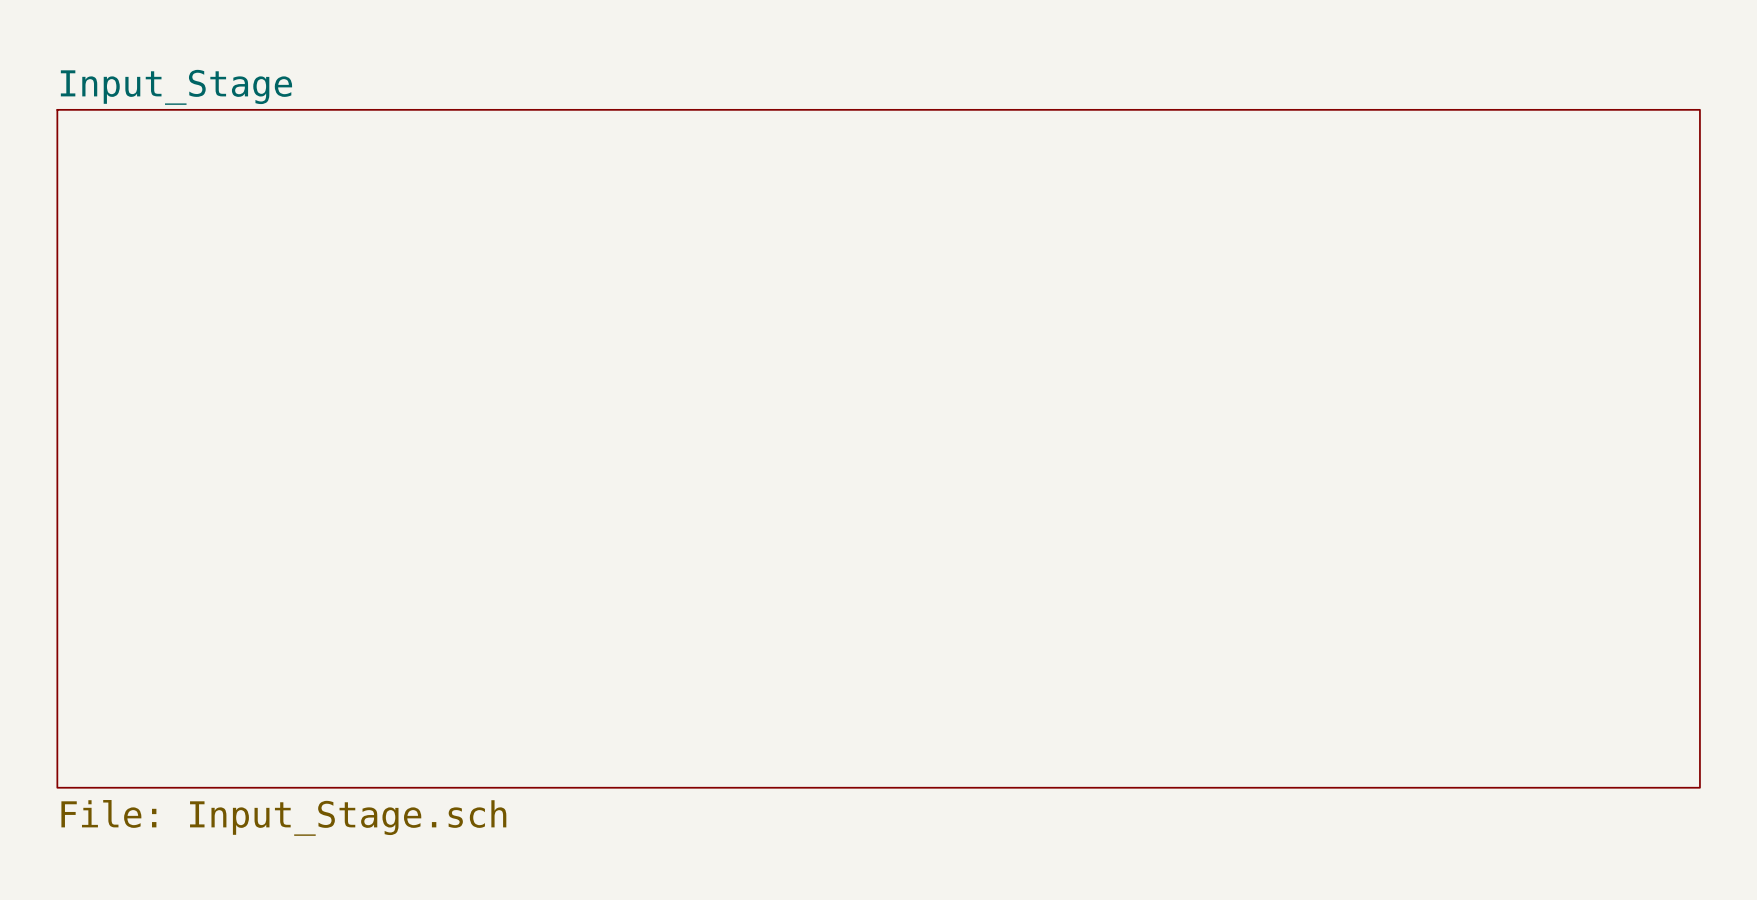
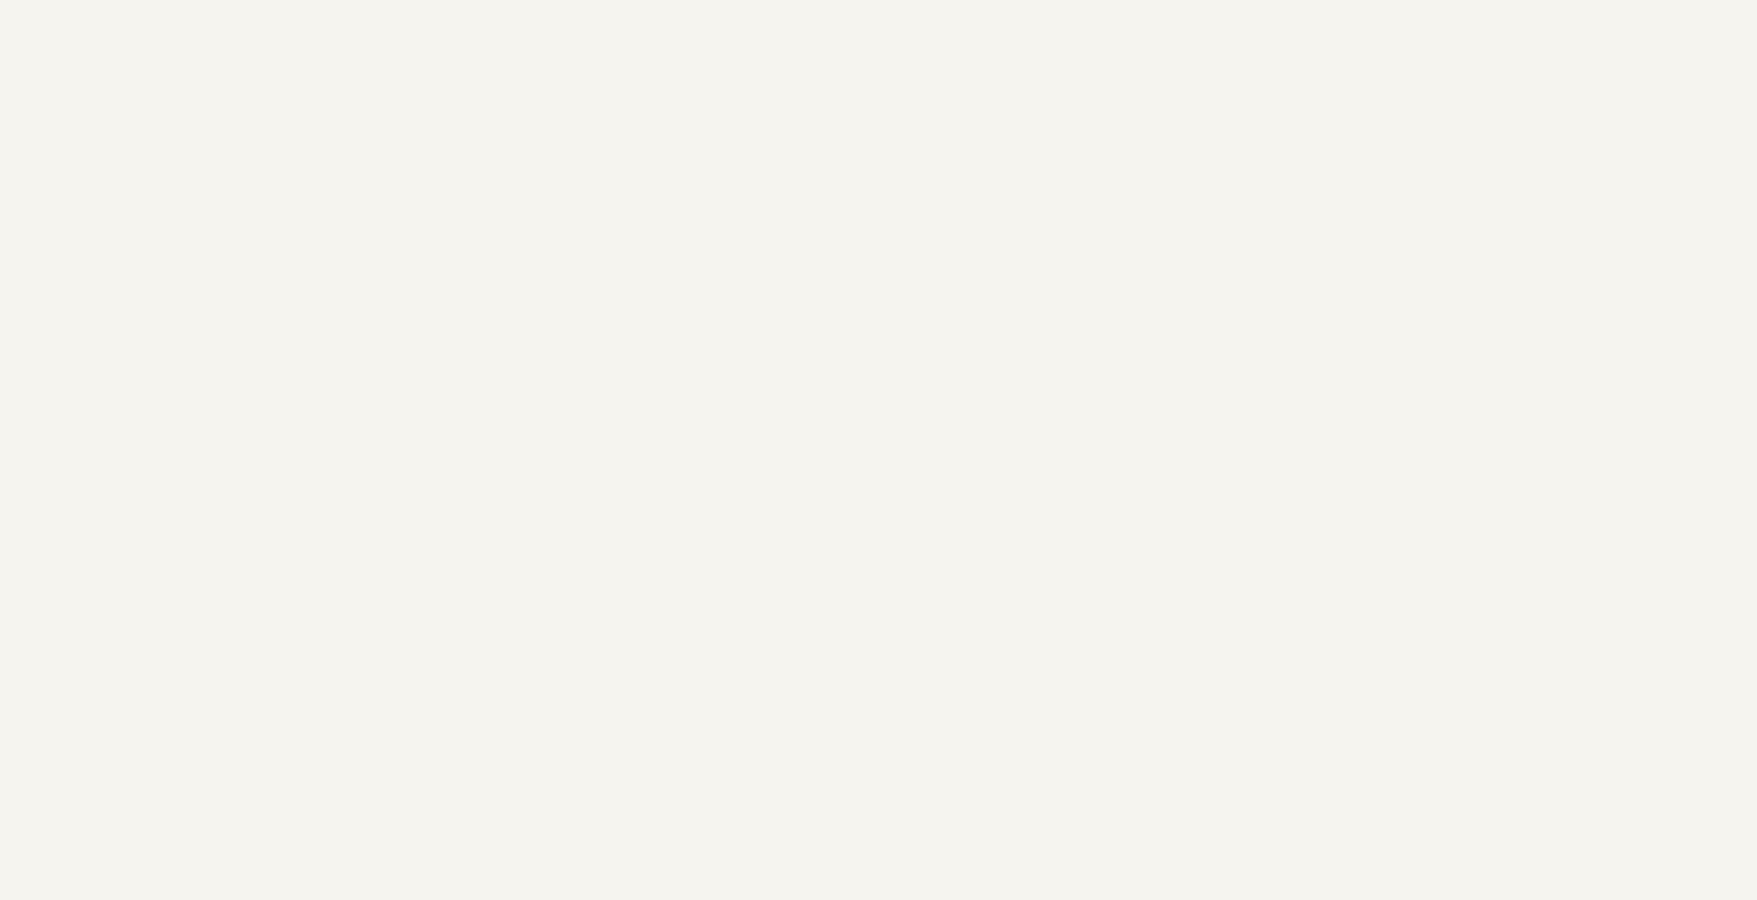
sheet Input_Stage: File: Input_Stage.sch (878, 448) -> none

